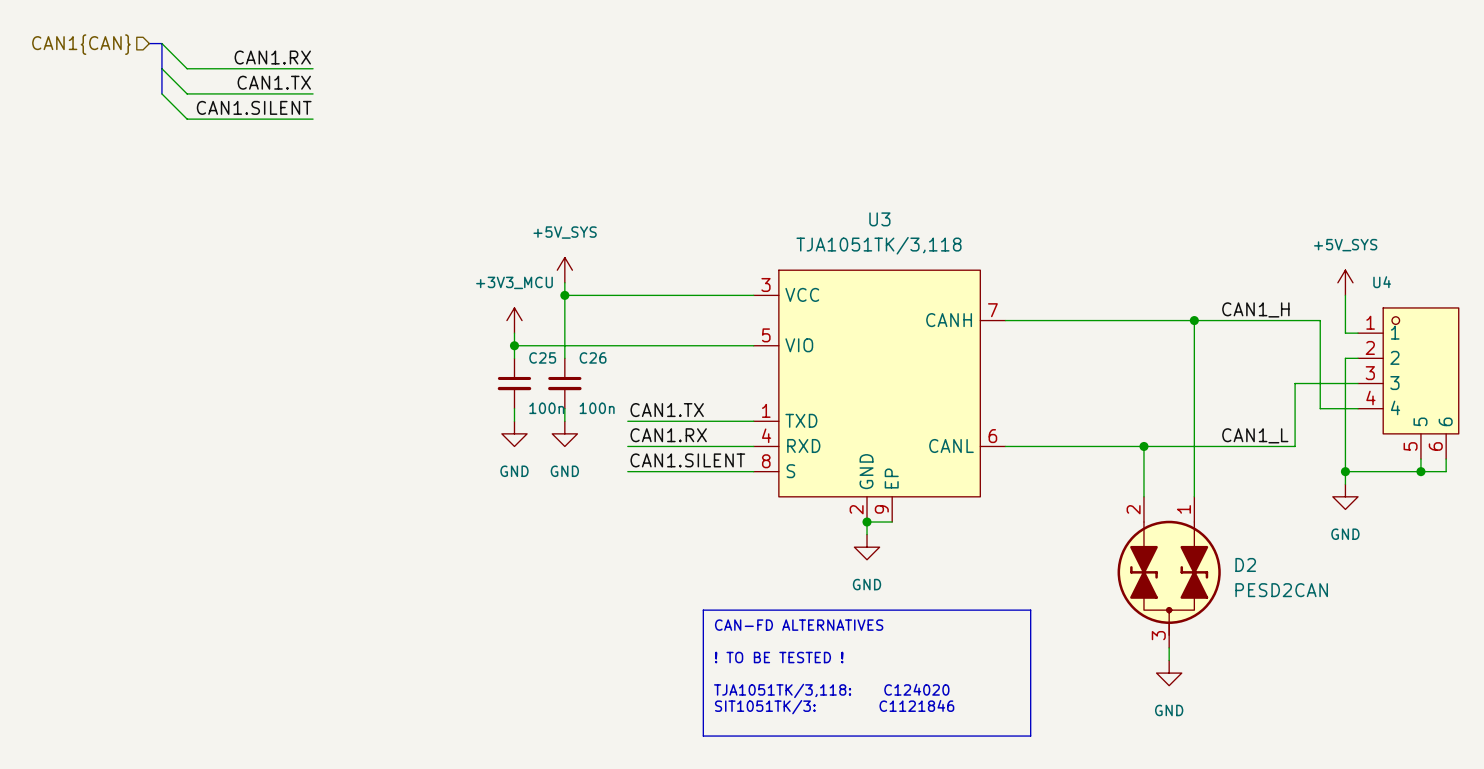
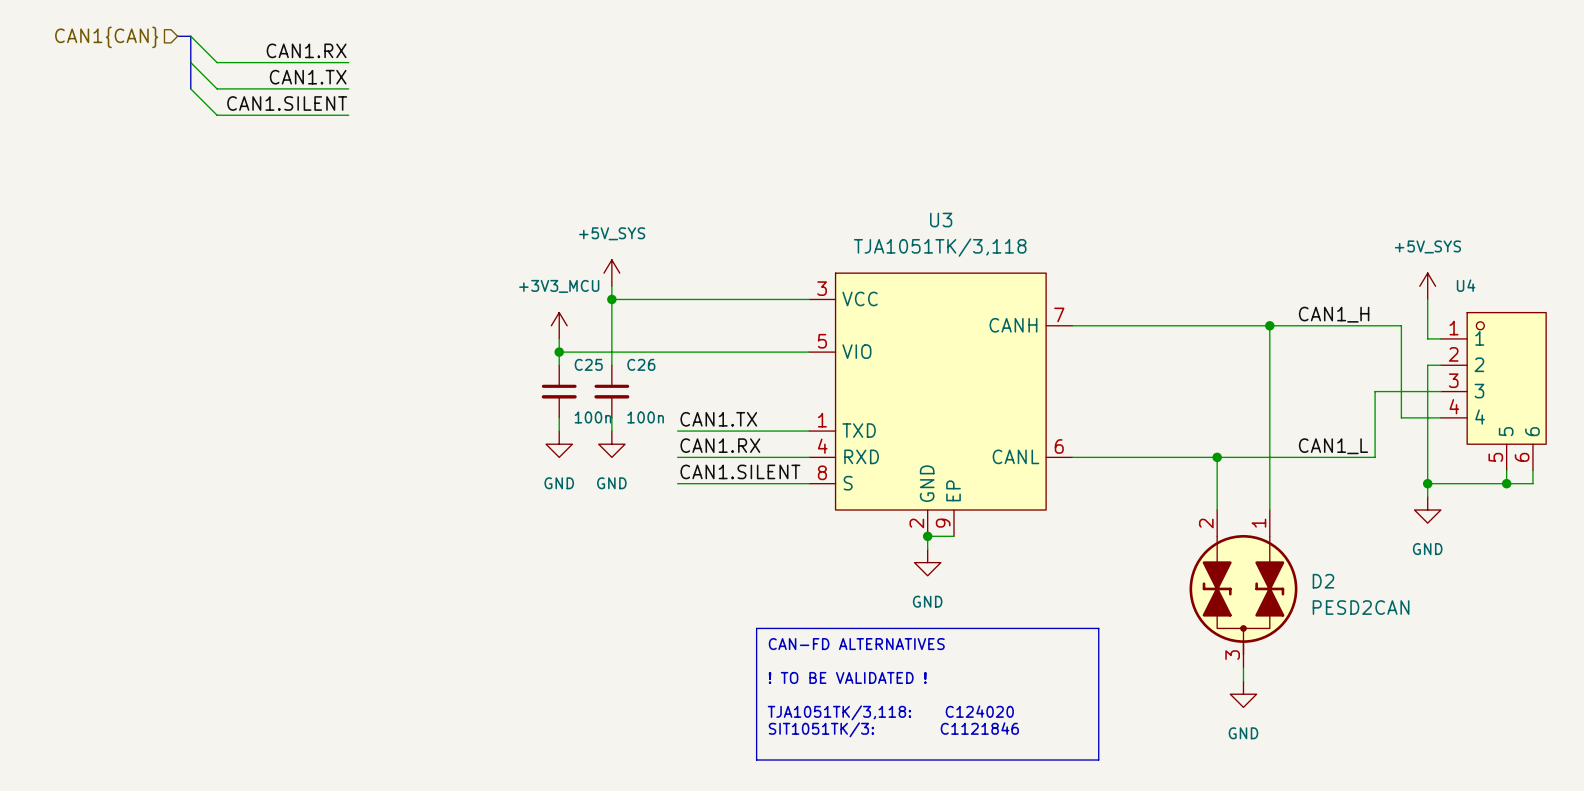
text: ! TO BE TESTED ! (779, 657) -> ! TO BE VALIDATED ! (847, 677)

